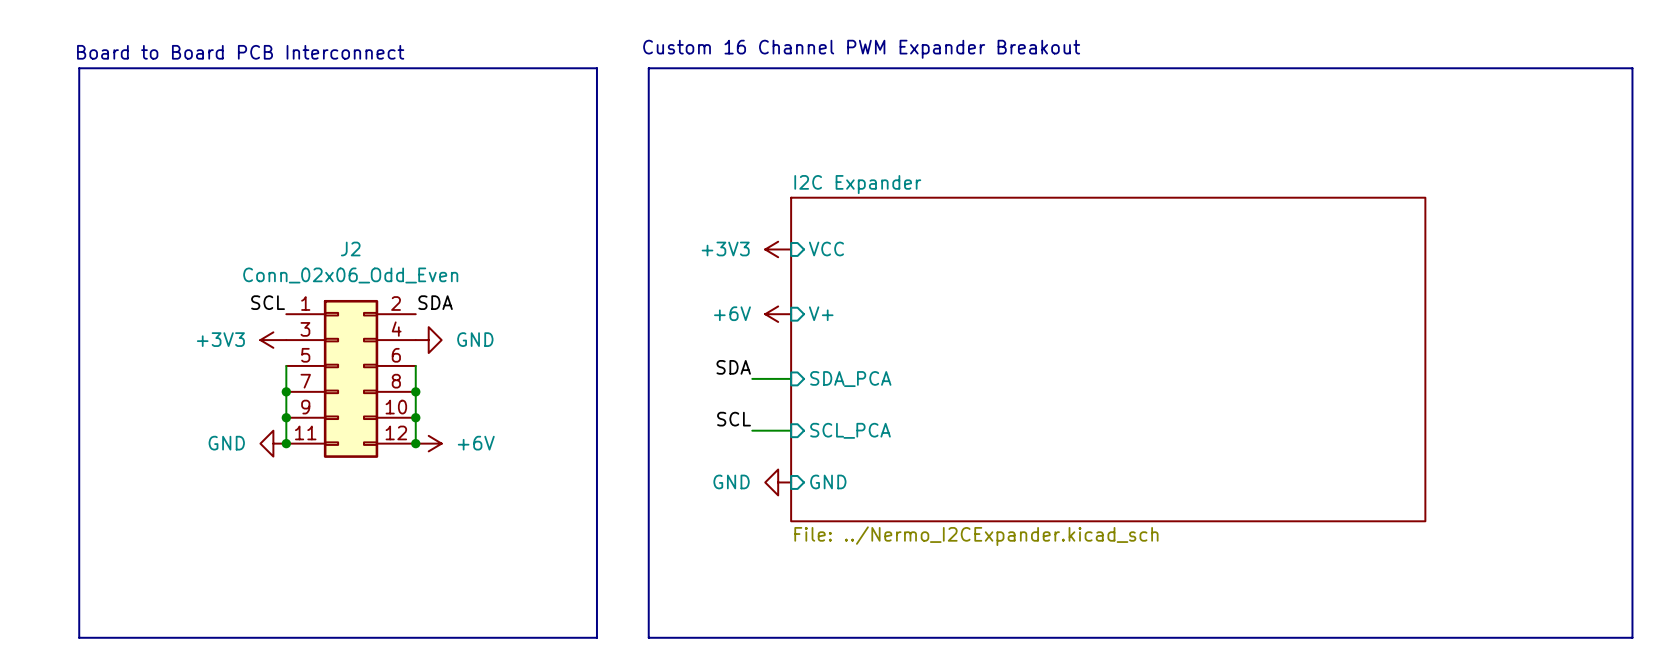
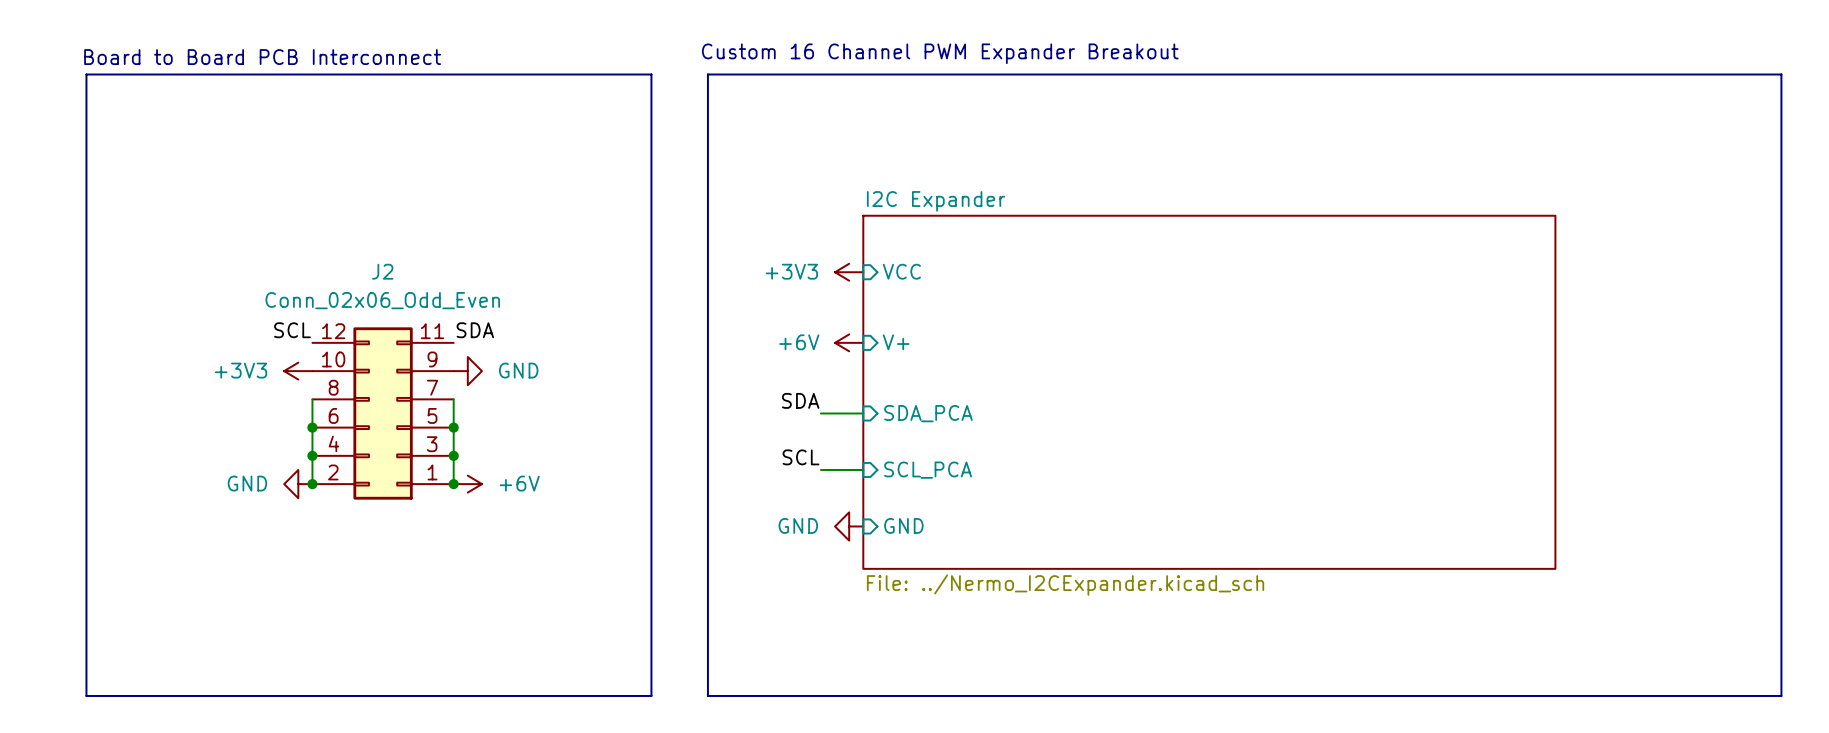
J2 rotation: 0° (351, 378) -> 180° (383, 413)

